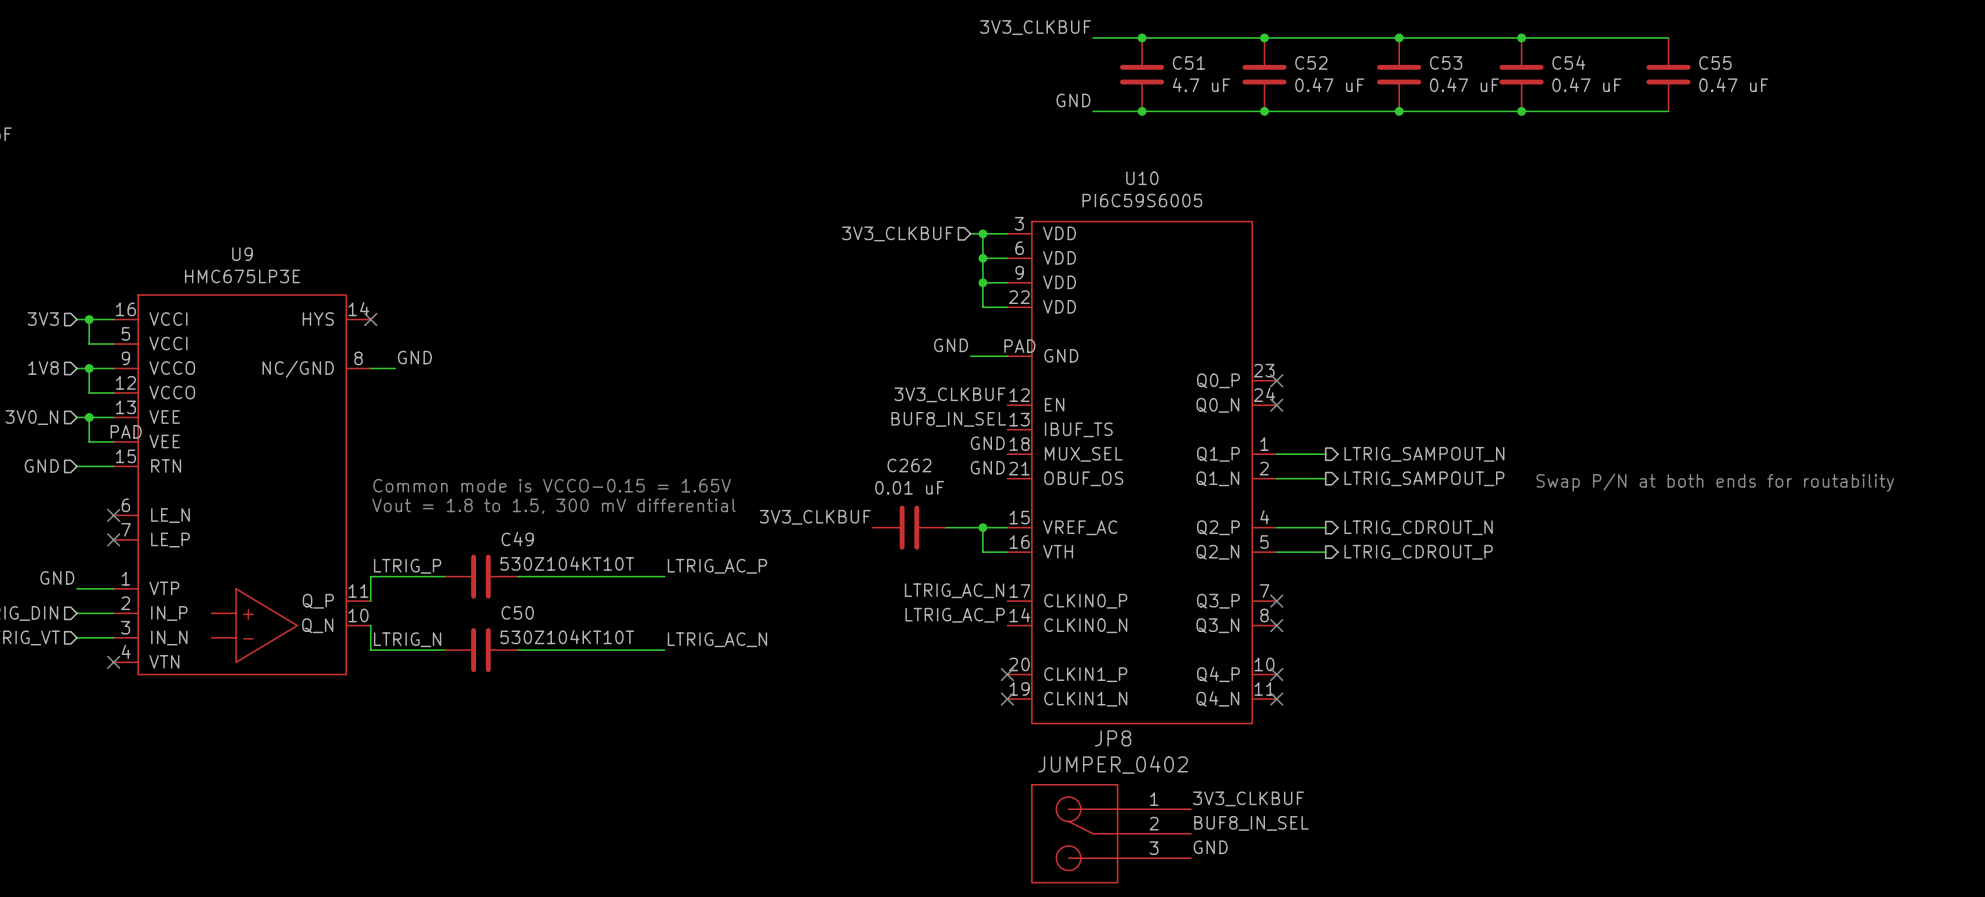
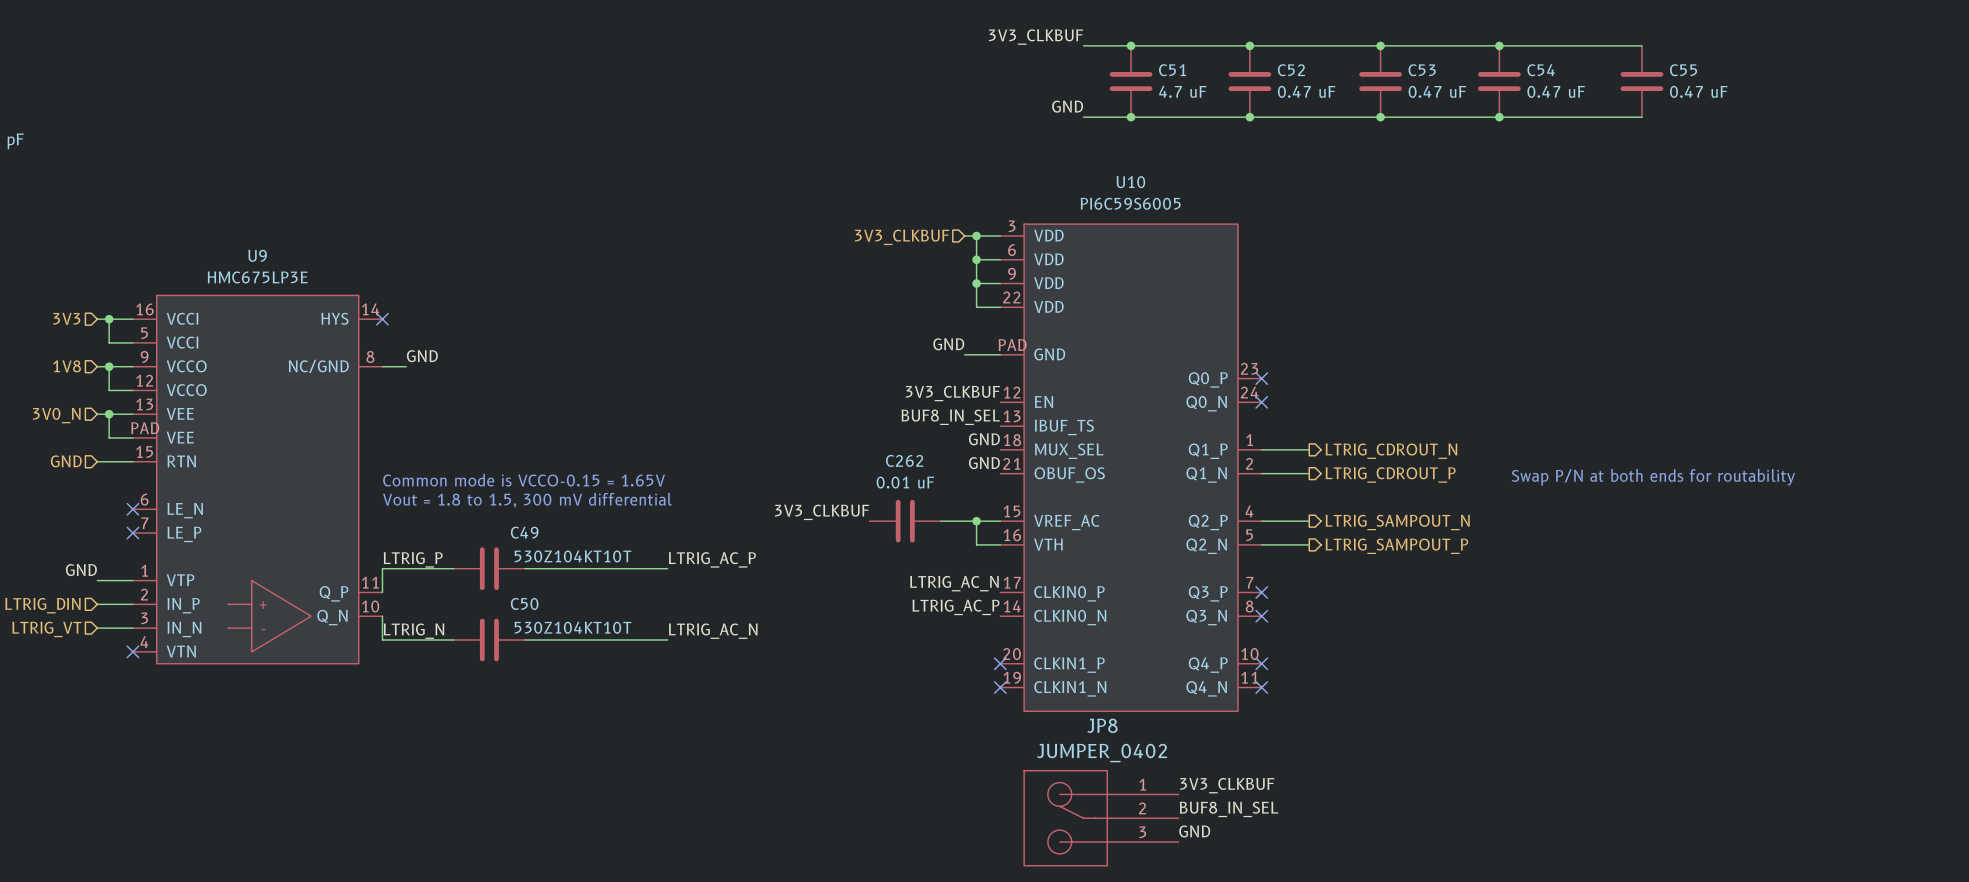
hierarchical label: LTRIG_SAMPOUT_N (1424, 454) -> LTRIG_CDROUT_N (1391, 451)
hierarchical label: LTRIG_SAMPOUT_P (1424, 478) -> LTRIG_CDROUT_P (1390, 474)
hierarchical label: LTRIG_CDROUT_N (1418, 527) -> LTRIG_SAMPOUT_N (1397, 522)
hierarchical label: LTRIG_CDROUT_P (1418, 552) -> LTRIG_SAMPOUT_P (1396, 546)

